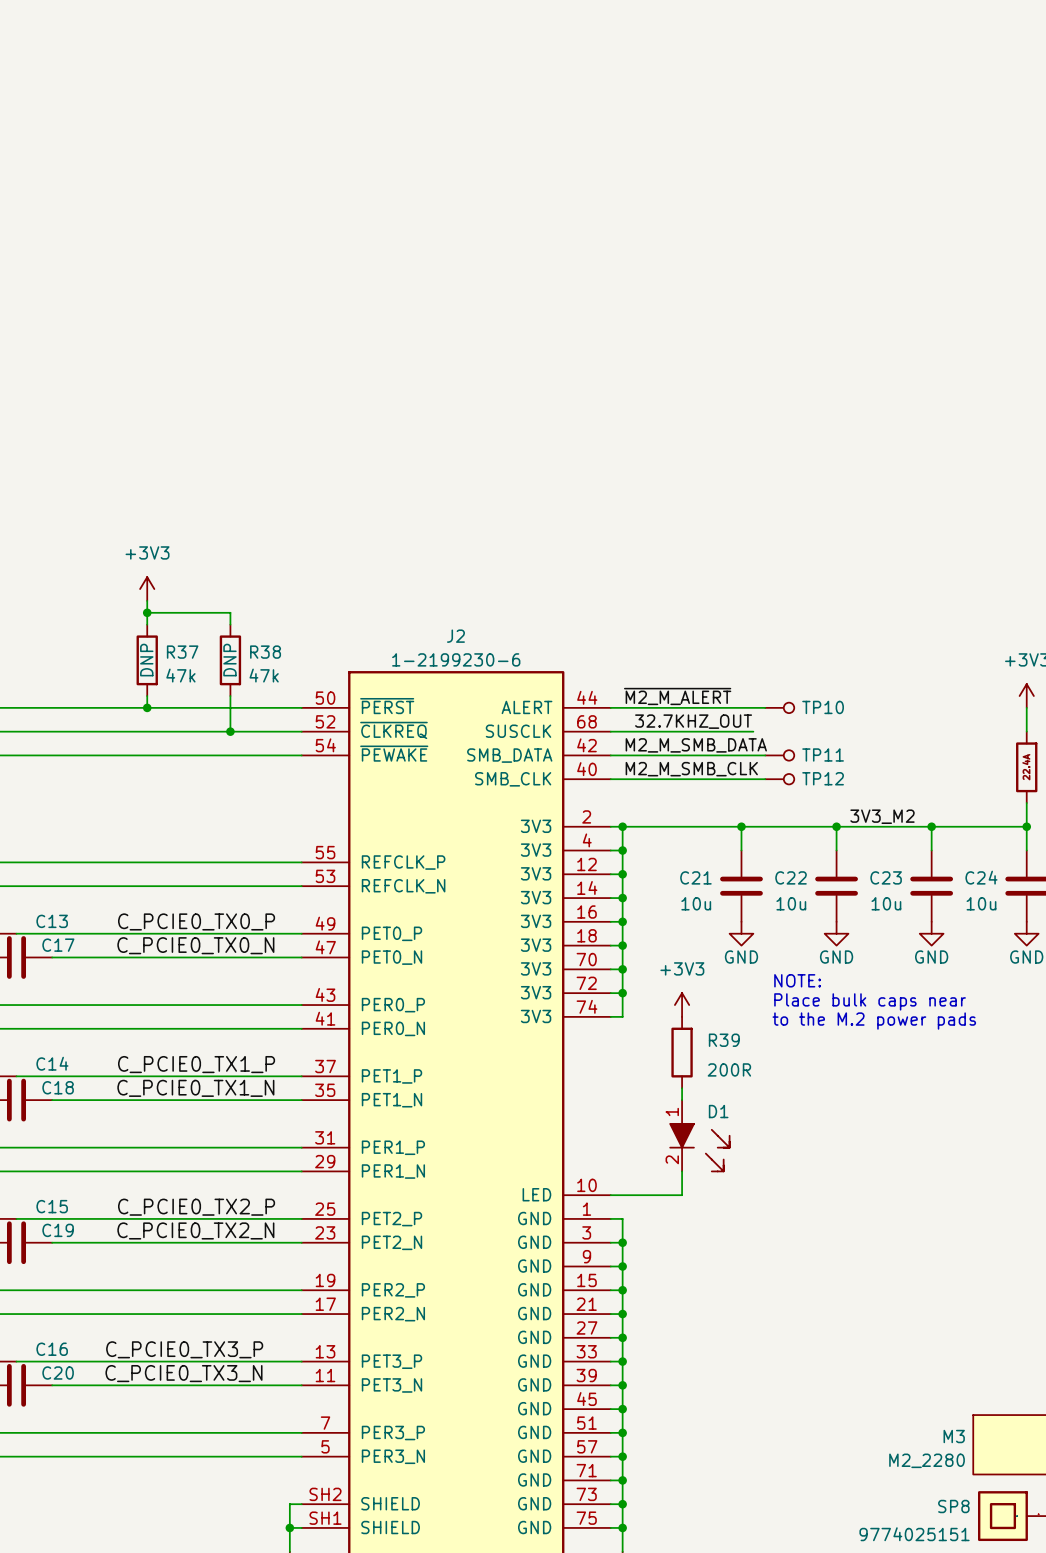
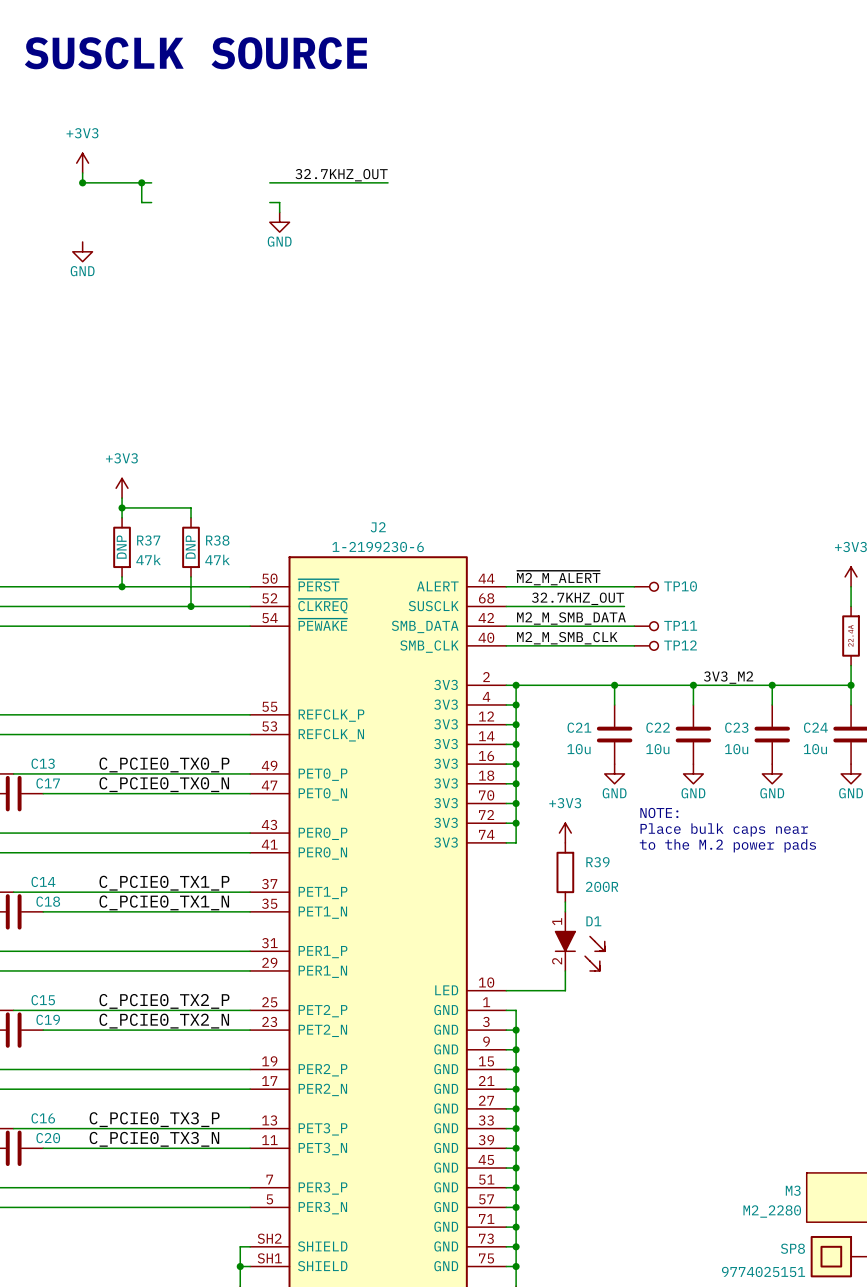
text: none -> SUSCLK SOURCE (195, 53)
power symbol: none -> +3V3 (82, 163)
wire: none -> (82, 173) (82, 182) (151, 182)
label: none -> 32.7KHZ_OUT (341, 175)
junction: none -> (82, 182)
wire: none -> (141, 182) (141, 202) (151, 202)
junction: none -> (141, 182)
wire: none -> (269, 182) (388, 182)
wire: none -> (269, 202) (279, 202) (279, 212)
power symbol: none -> GND (279, 222)
power symbol: none -> GND (82, 251)

